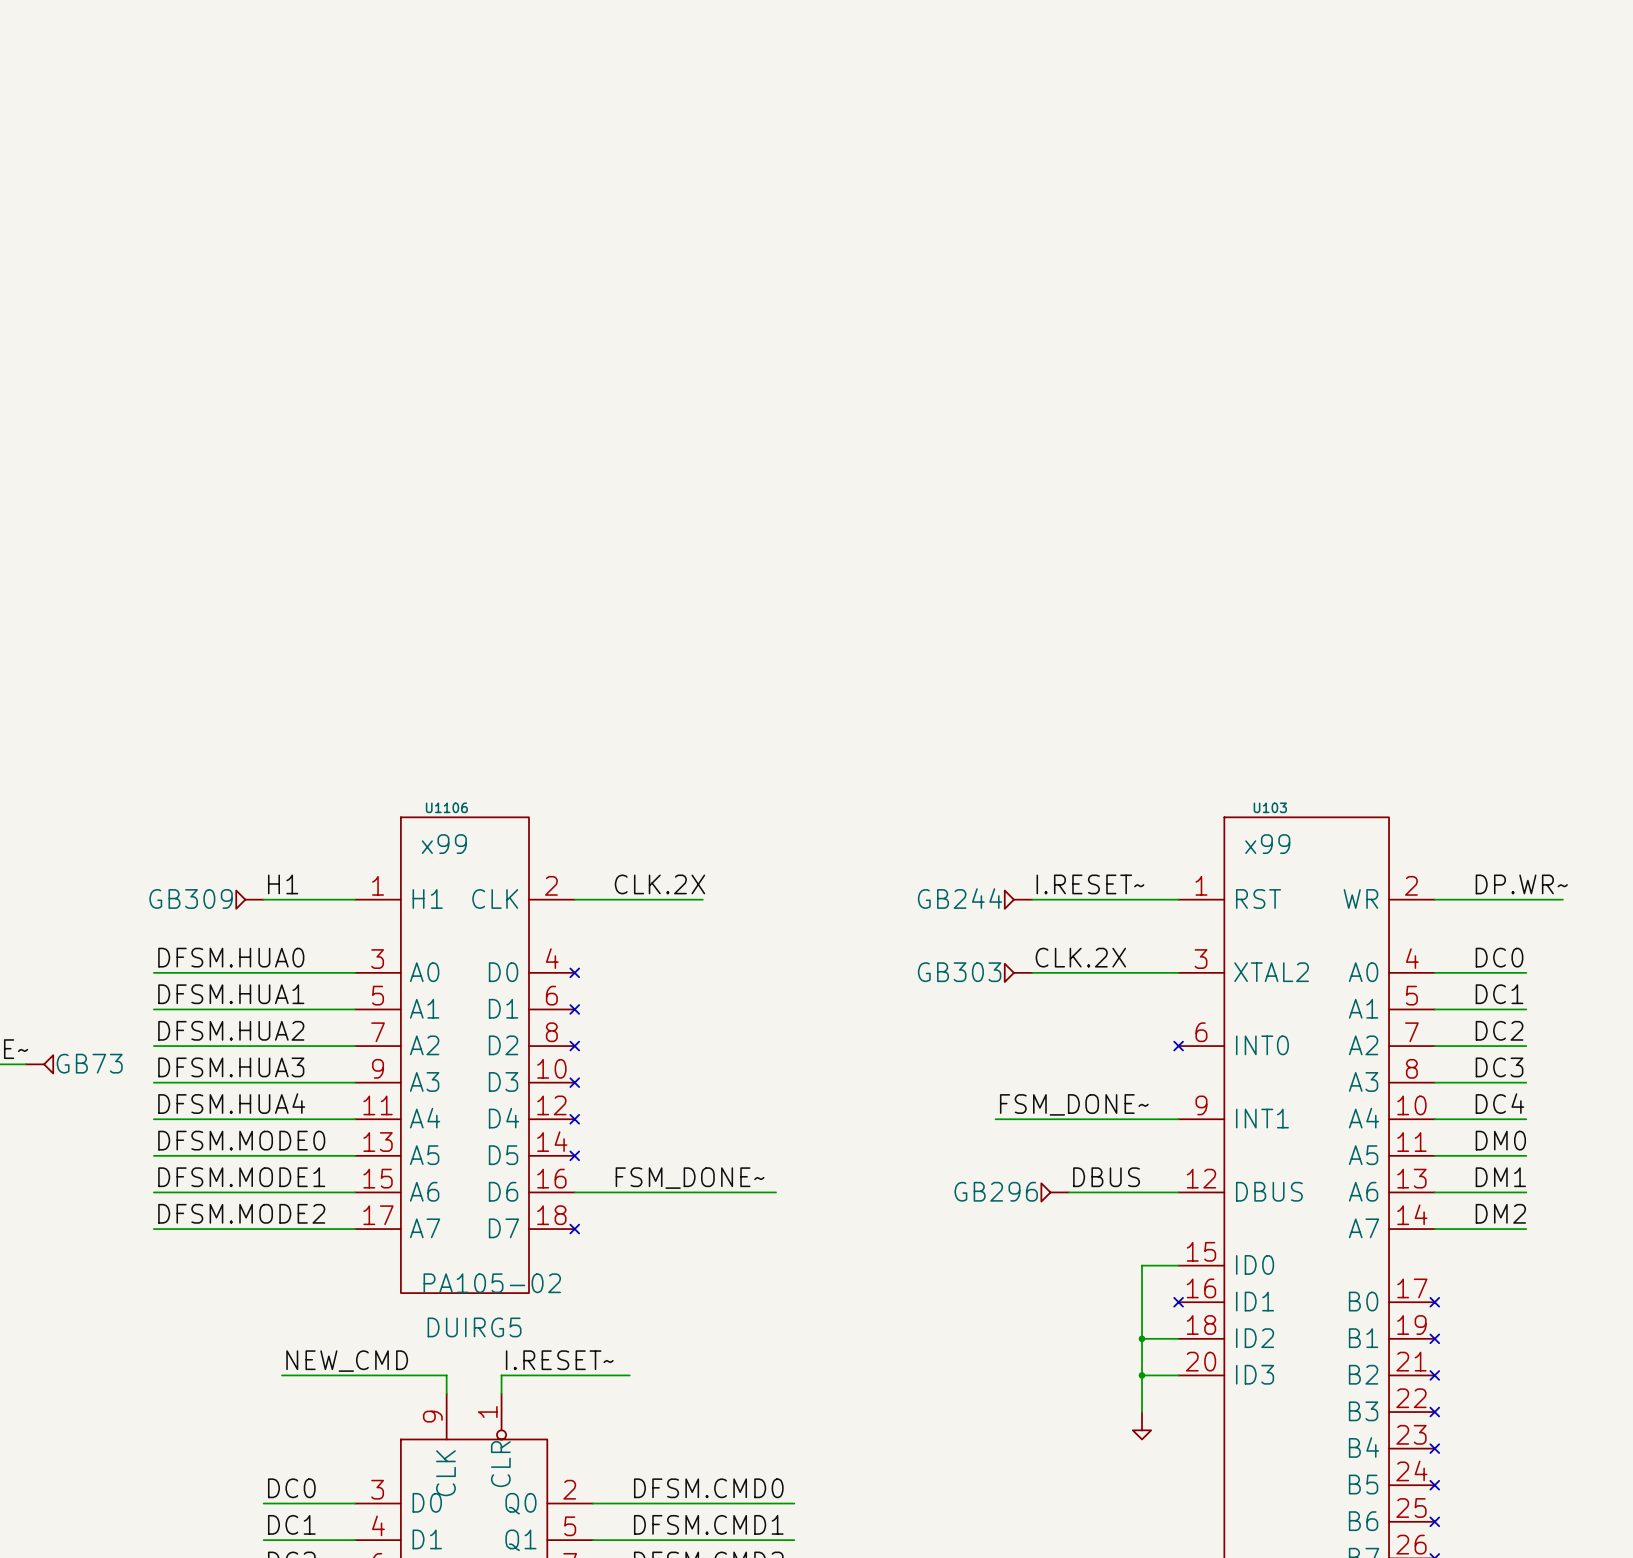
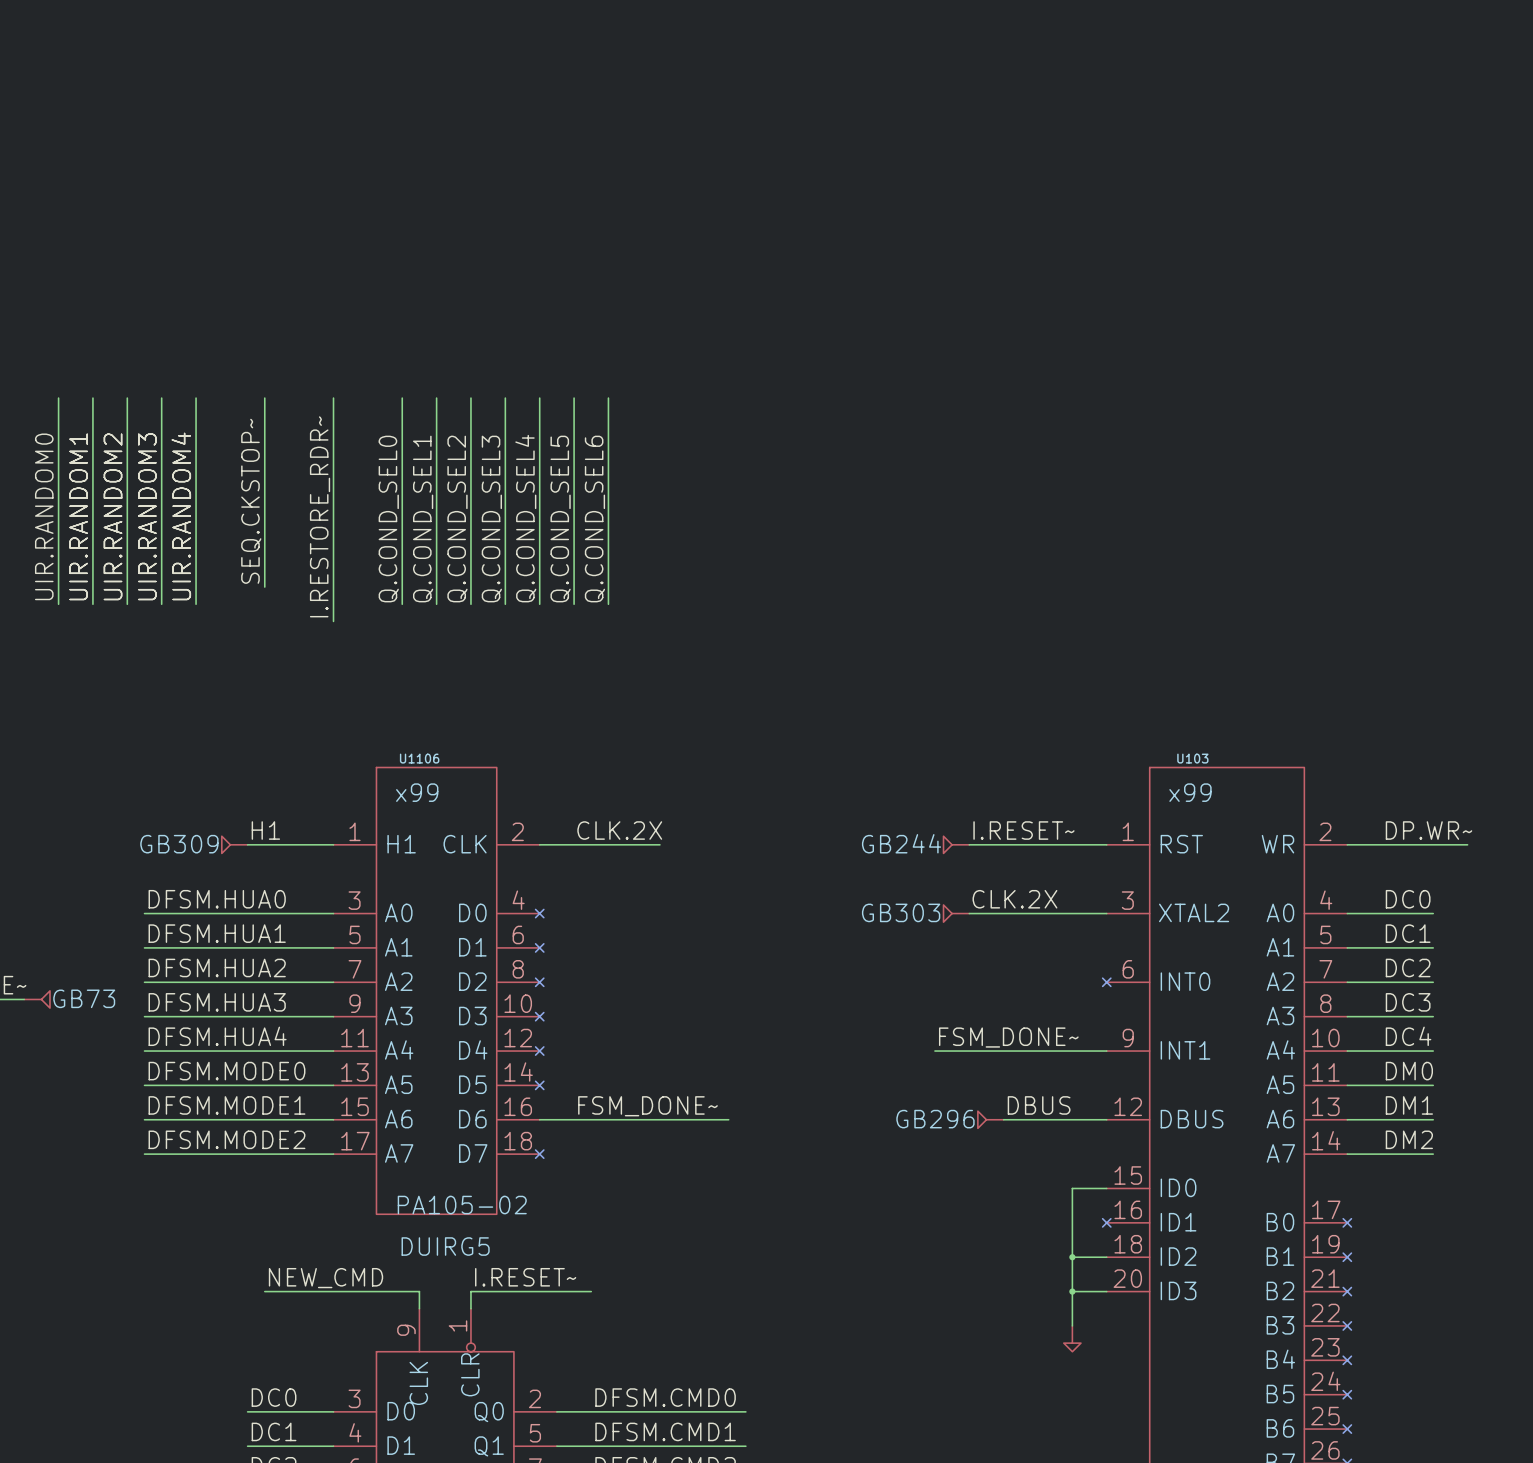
wire: none -> (58, 398) (58, 604)
wire: none -> (92, 398) (92, 604)
wire: none -> (127, 398) (127, 604)
wire: none -> (161, 398) (161, 604)
wire: none -> (196, 398) (196, 604)
wire: none -> (264, 398) (264, 587)
wire: none -> (333, 398) (333, 621)
wire: none -> (402, 398) (402, 604)
wire: none -> (436, 398) (436, 604)
wire: none -> (470, 398) (470, 604)
wire: none -> (505, 398) (505, 604)
wire: none -> (539, 398) (539, 604)
wire: none -> (574, 398) (574, 604)
wire: none -> (608, 398) (608, 604)
label: none -> SEQ.CKSTOP~ (251, 501)
label: none -> UIR.RANDOM4 (181, 516)
label: none -> UIR.RANDOM0 (44, 516)
label: none -> UIR.RANDOM1 (78, 516)
label: none -> UIR.RANDOM2 (113, 516)
label: none -> UIR.RANDOM3 (147, 516)
label: none -> I.RESTORE_RDR~ (320, 516)
label: none -> Q.COND_SEL0 (388, 519)
label: none -> Q.COND_SEL1 (423, 519)
label: none -> Q.COND_SEL2 (457, 519)
label: none -> Q.COND_SEL3 (491, 519)
label: none -> Q.COND_SEL4 (525, 518)
label: none -> Q.COND_SEL5 (560, 519)
label: none -> Q.COND_SEL6 (594, 519)

